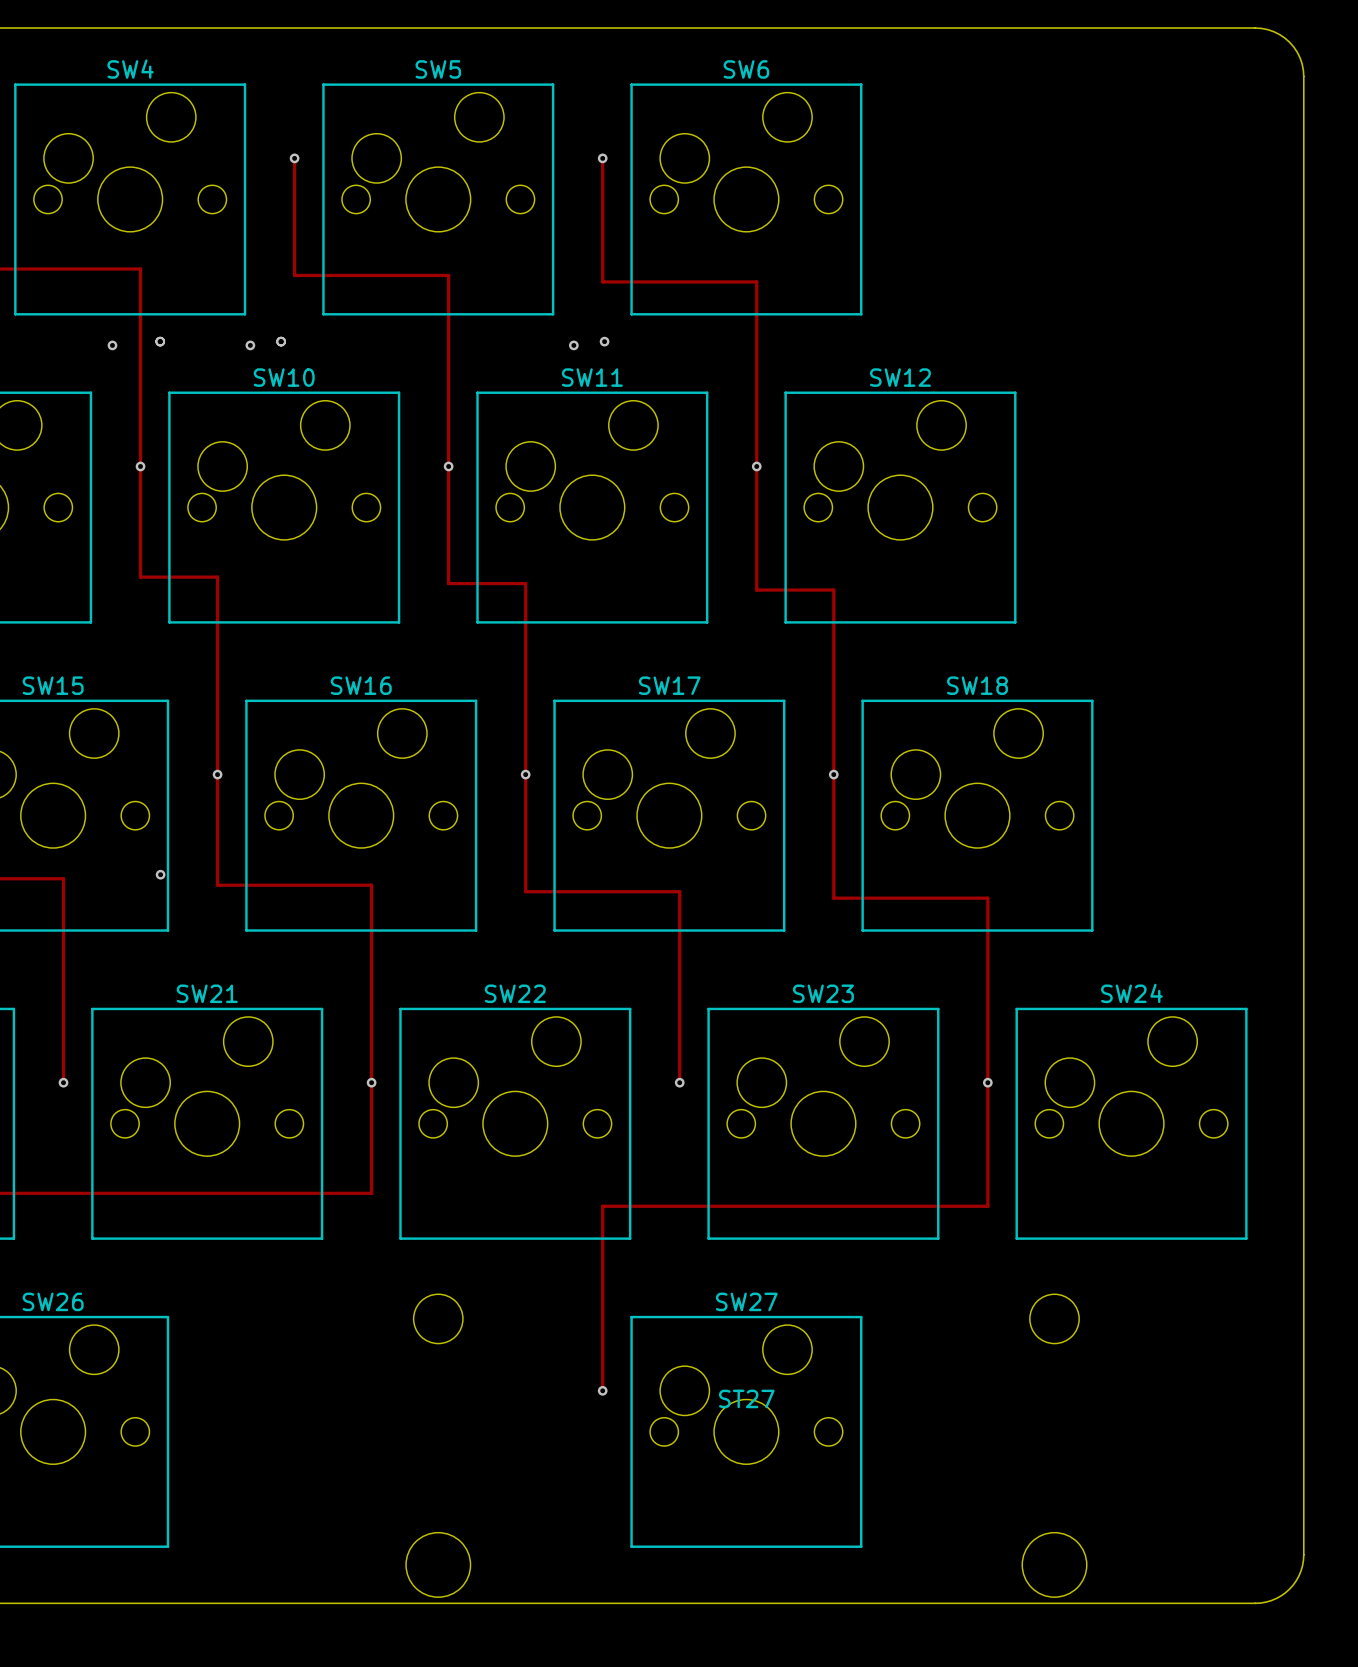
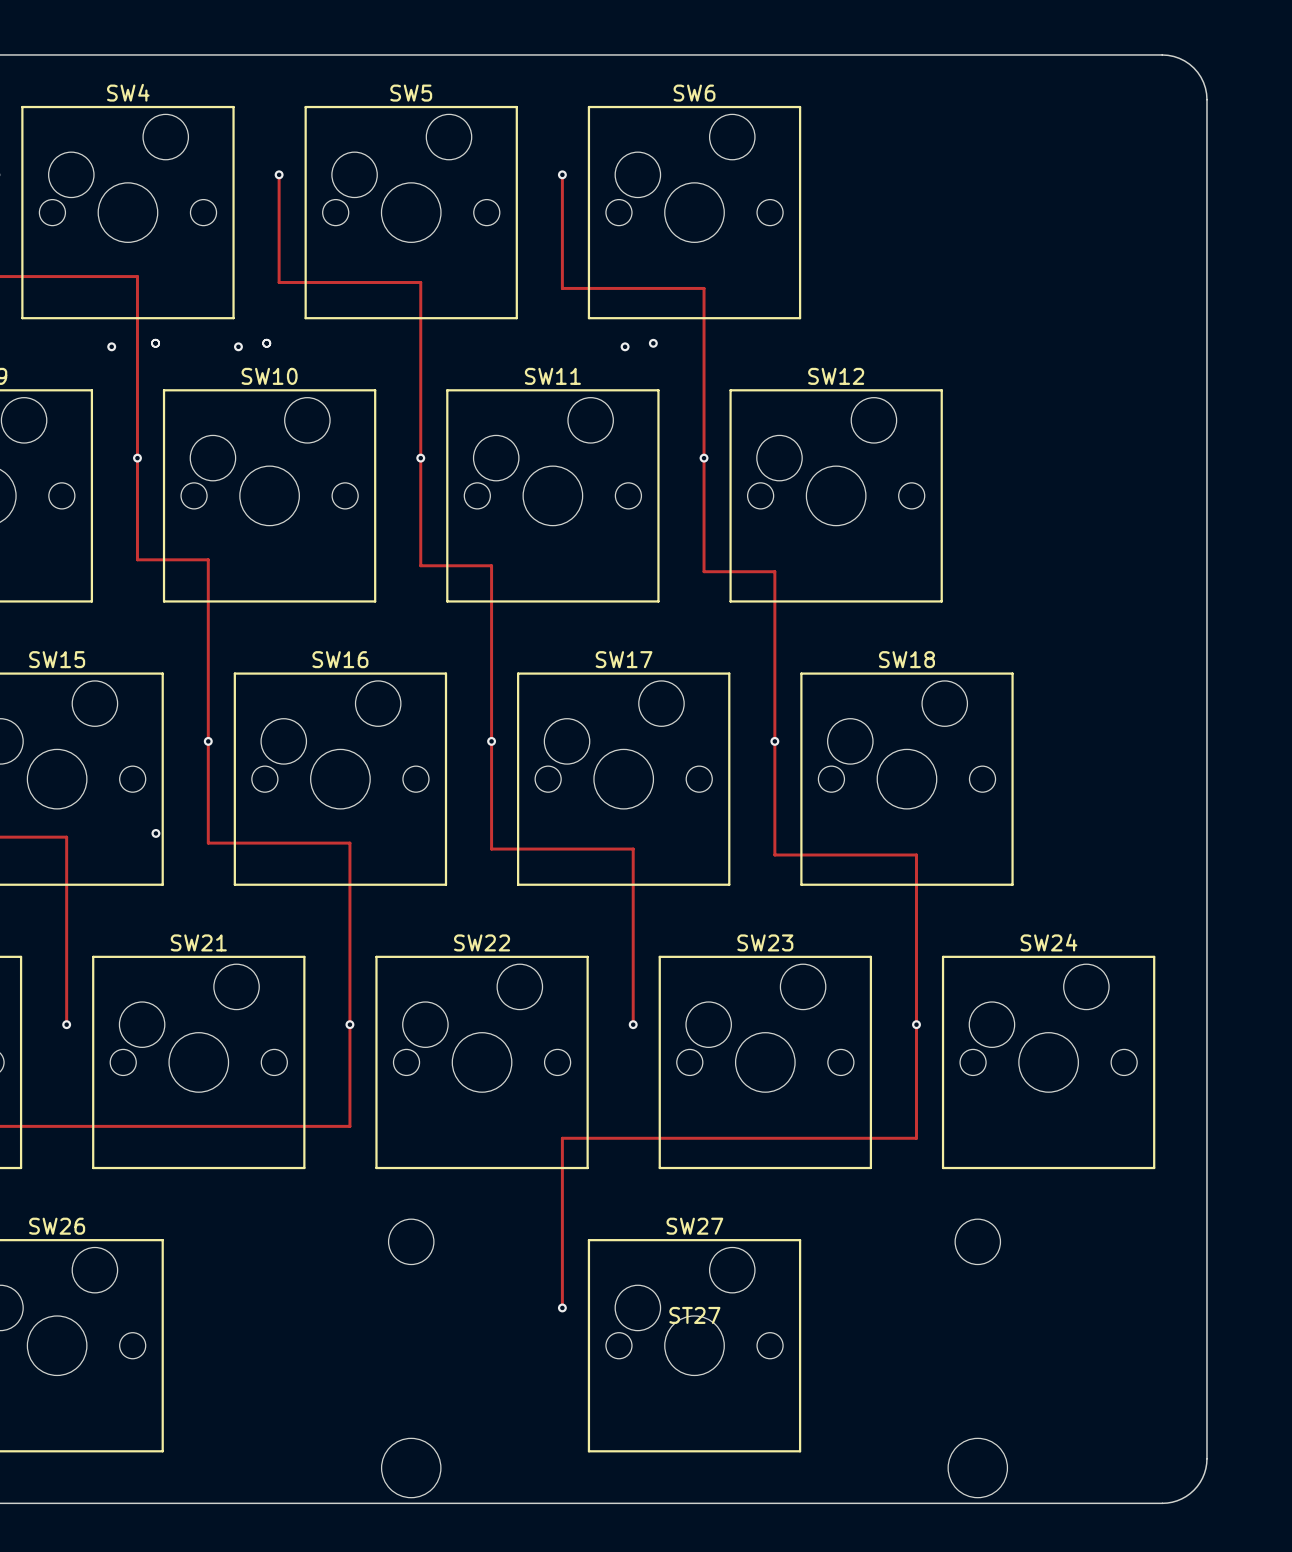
via: (604, 341) -> none
via: none -> (653, 343)
via: (573, 345) -> none
via: none -> (625, 346)

